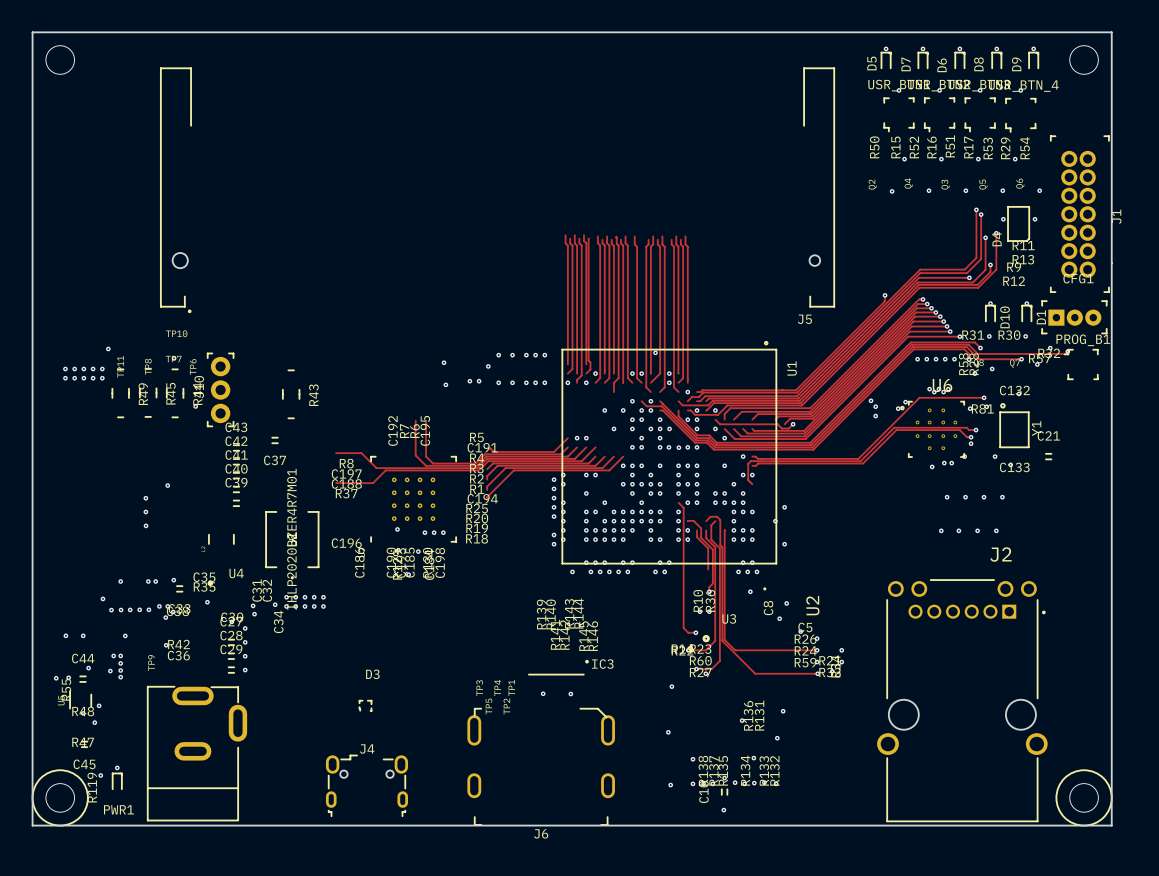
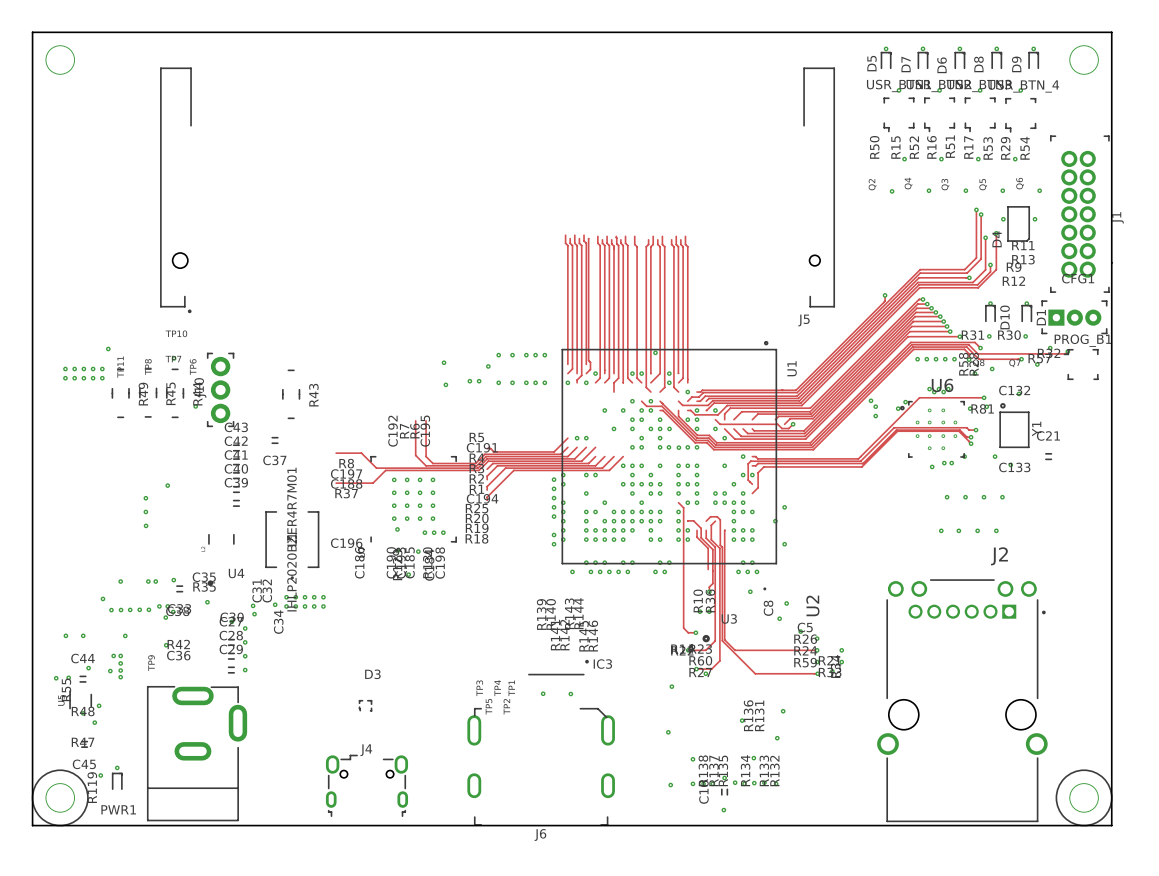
track: none -> (971, 443) (958, 431) (897, 431) (861, 466) (763, 466) (758, 472) (758, 487) (752, 493)

